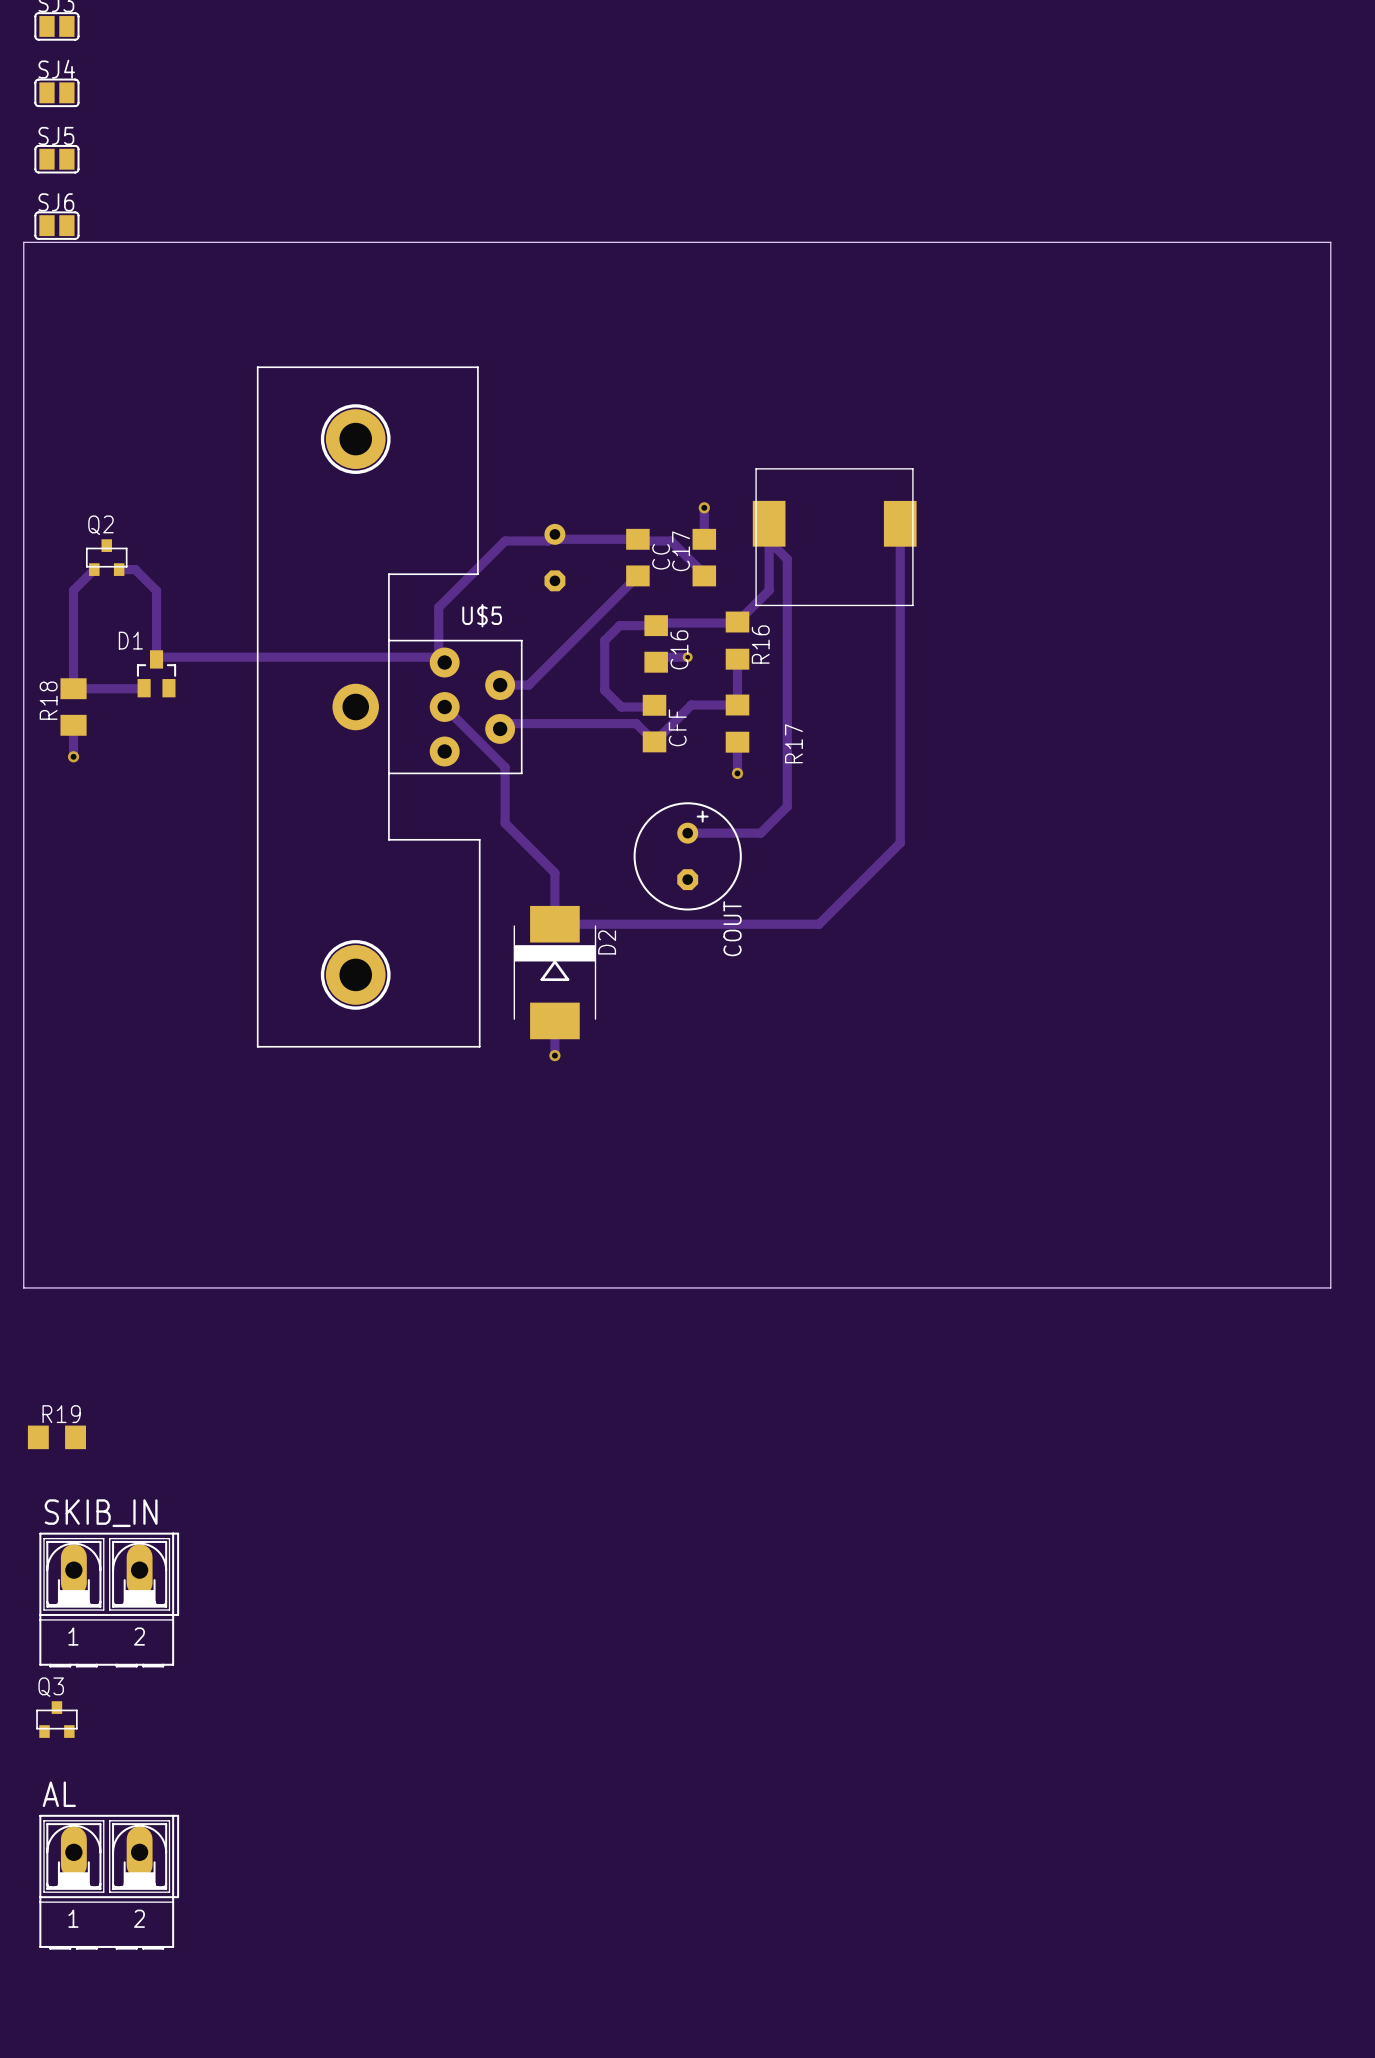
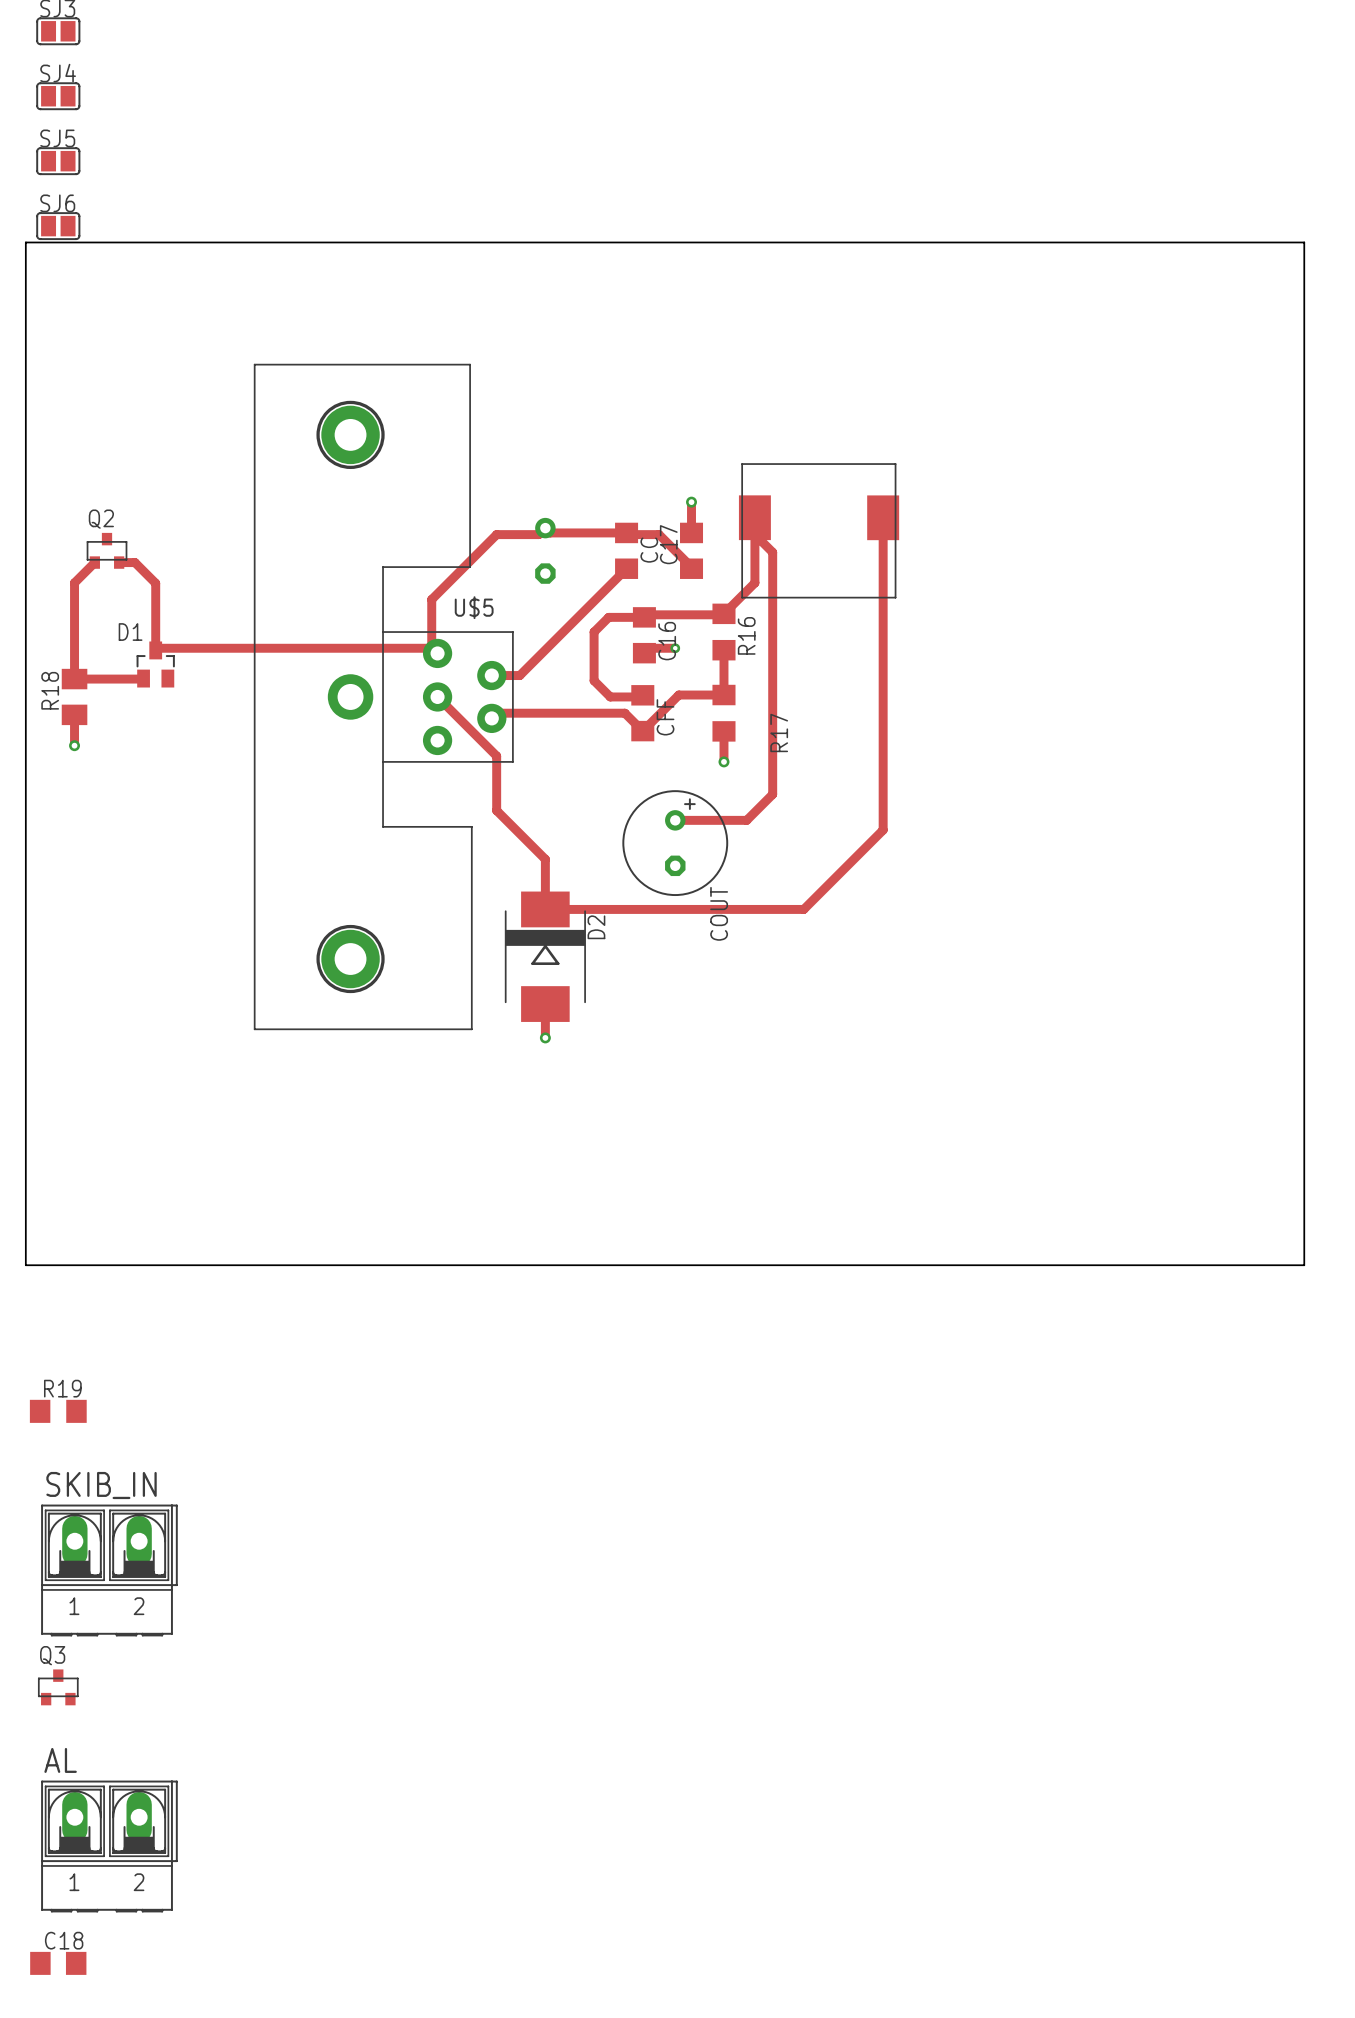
C18: none -> (58, 1963)

